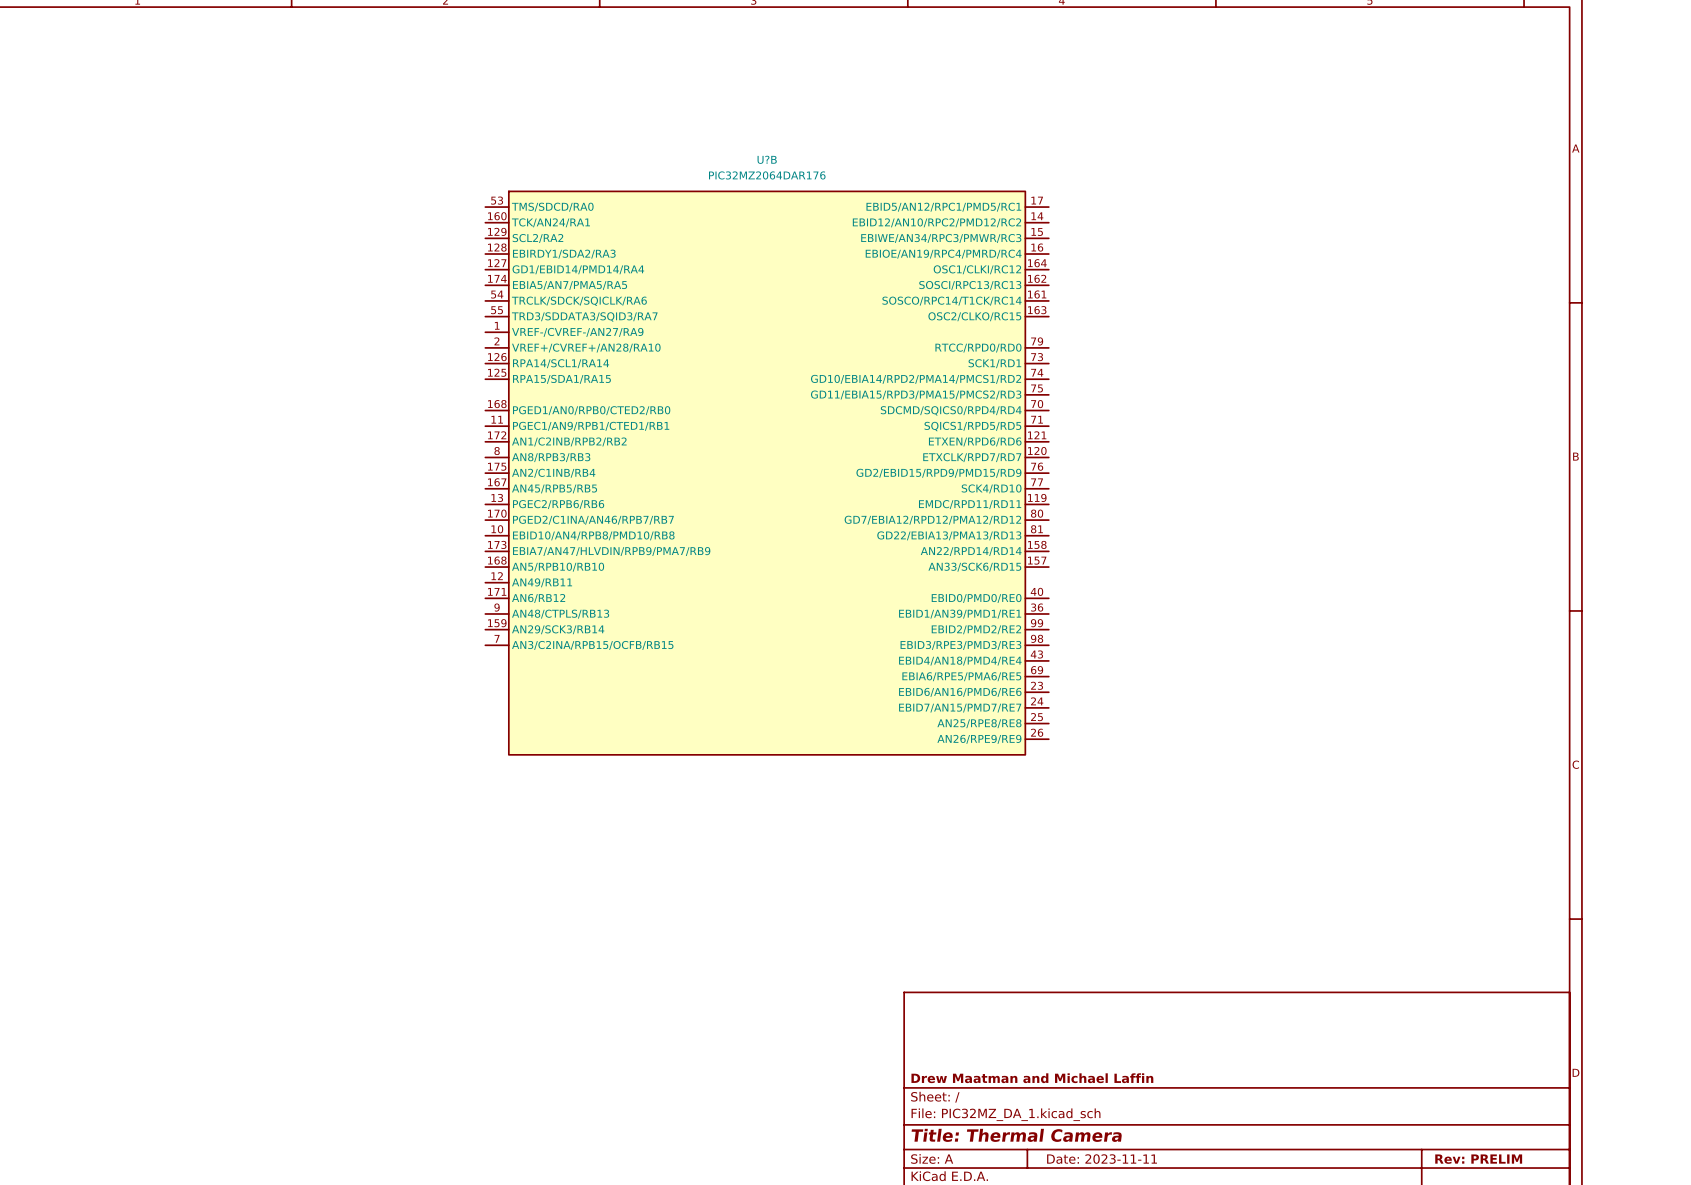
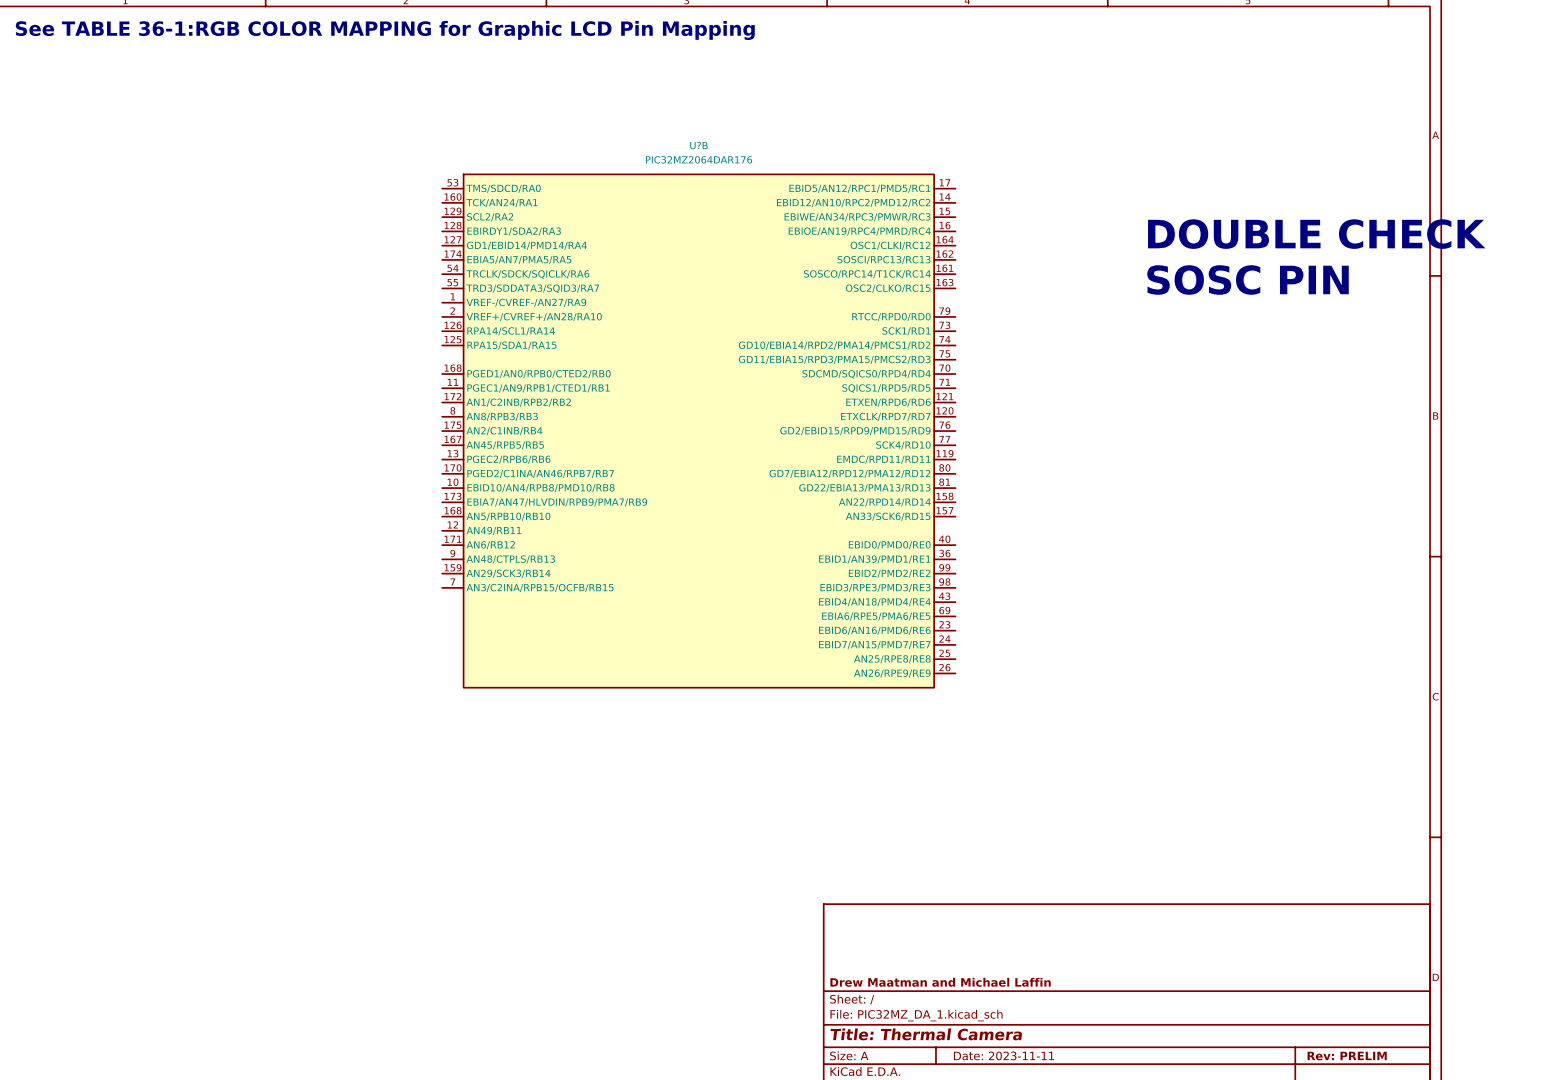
text: none -> See TABLE 36-1:RGB COLOR MAPPING for Graphic LCD Pin Mapping (385, 30)
text: none -> DOUBLE CHECK (1316, 234)
text: none -> SOSC PIN (1248, 280)

